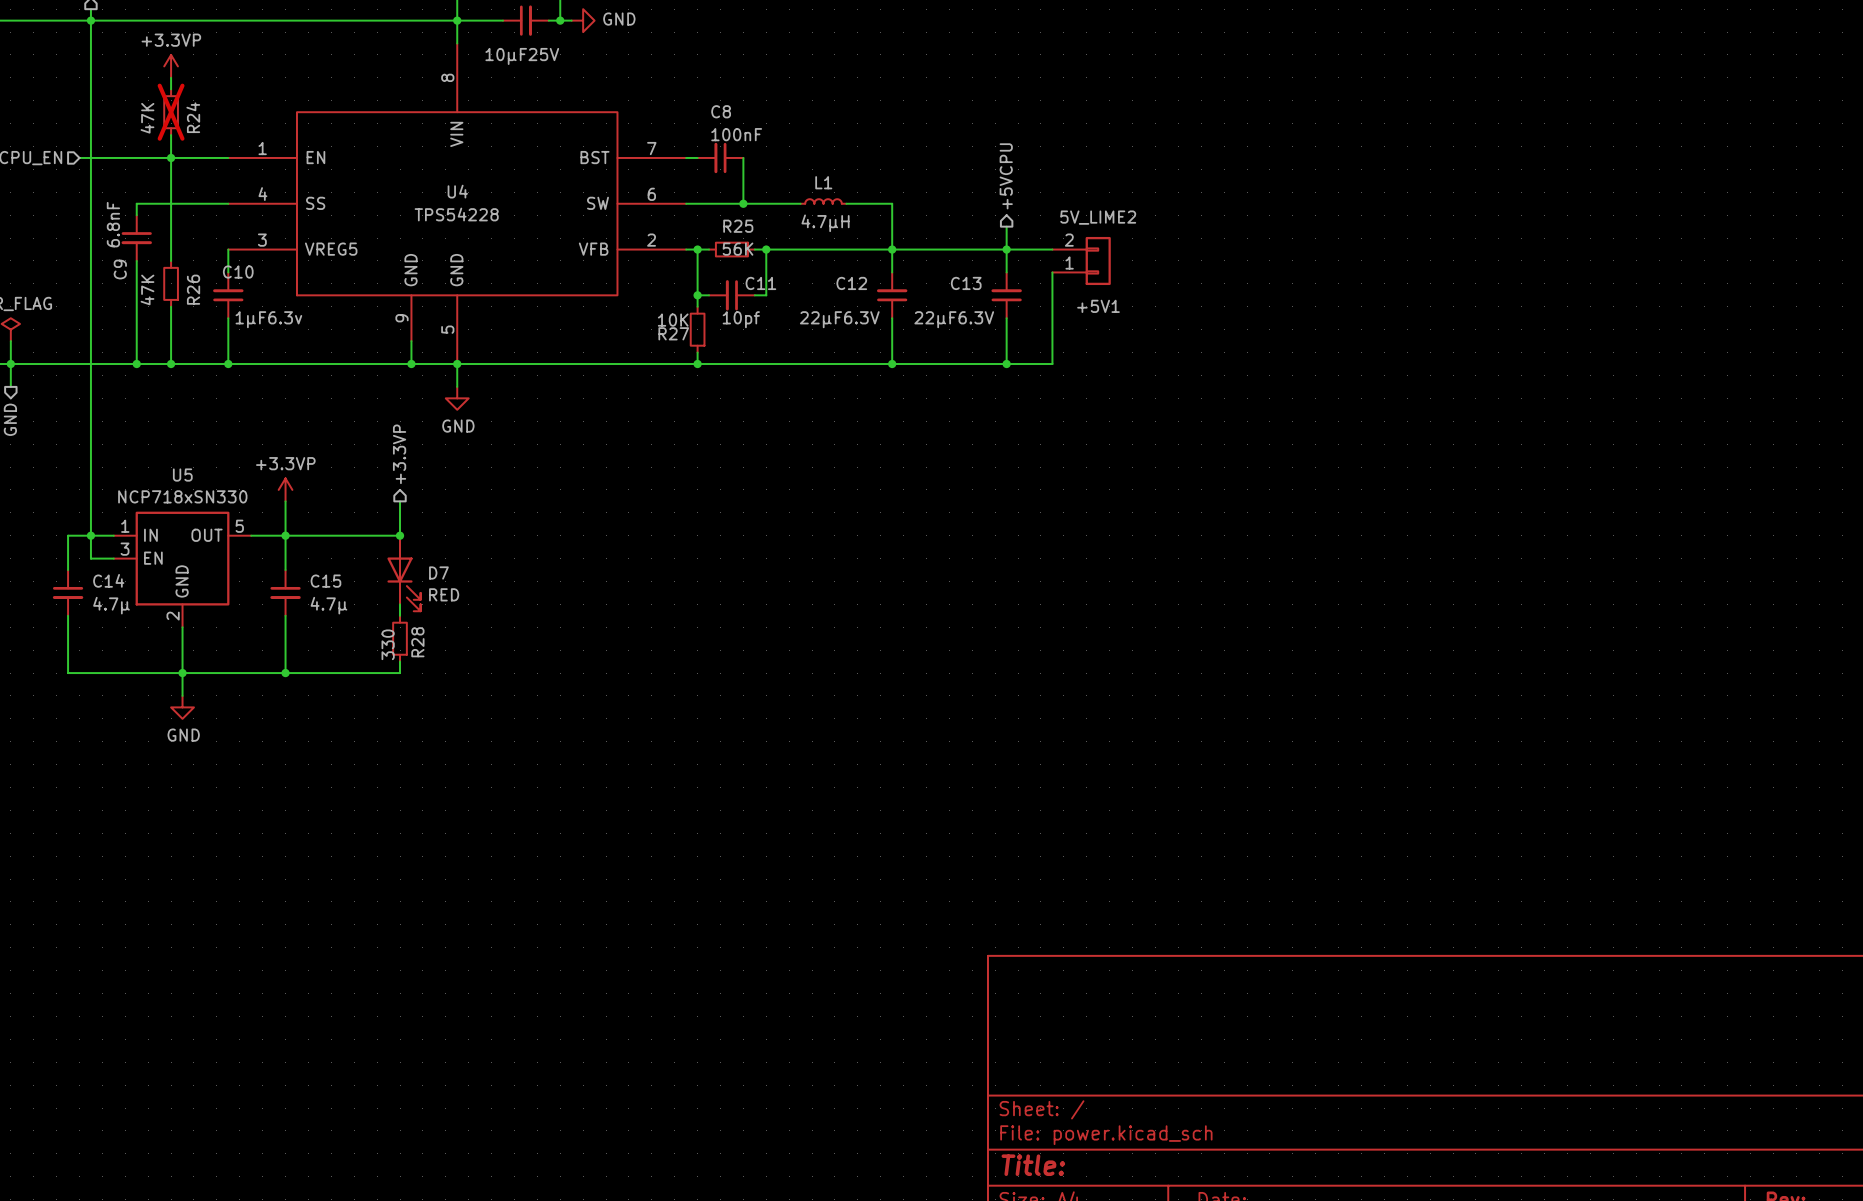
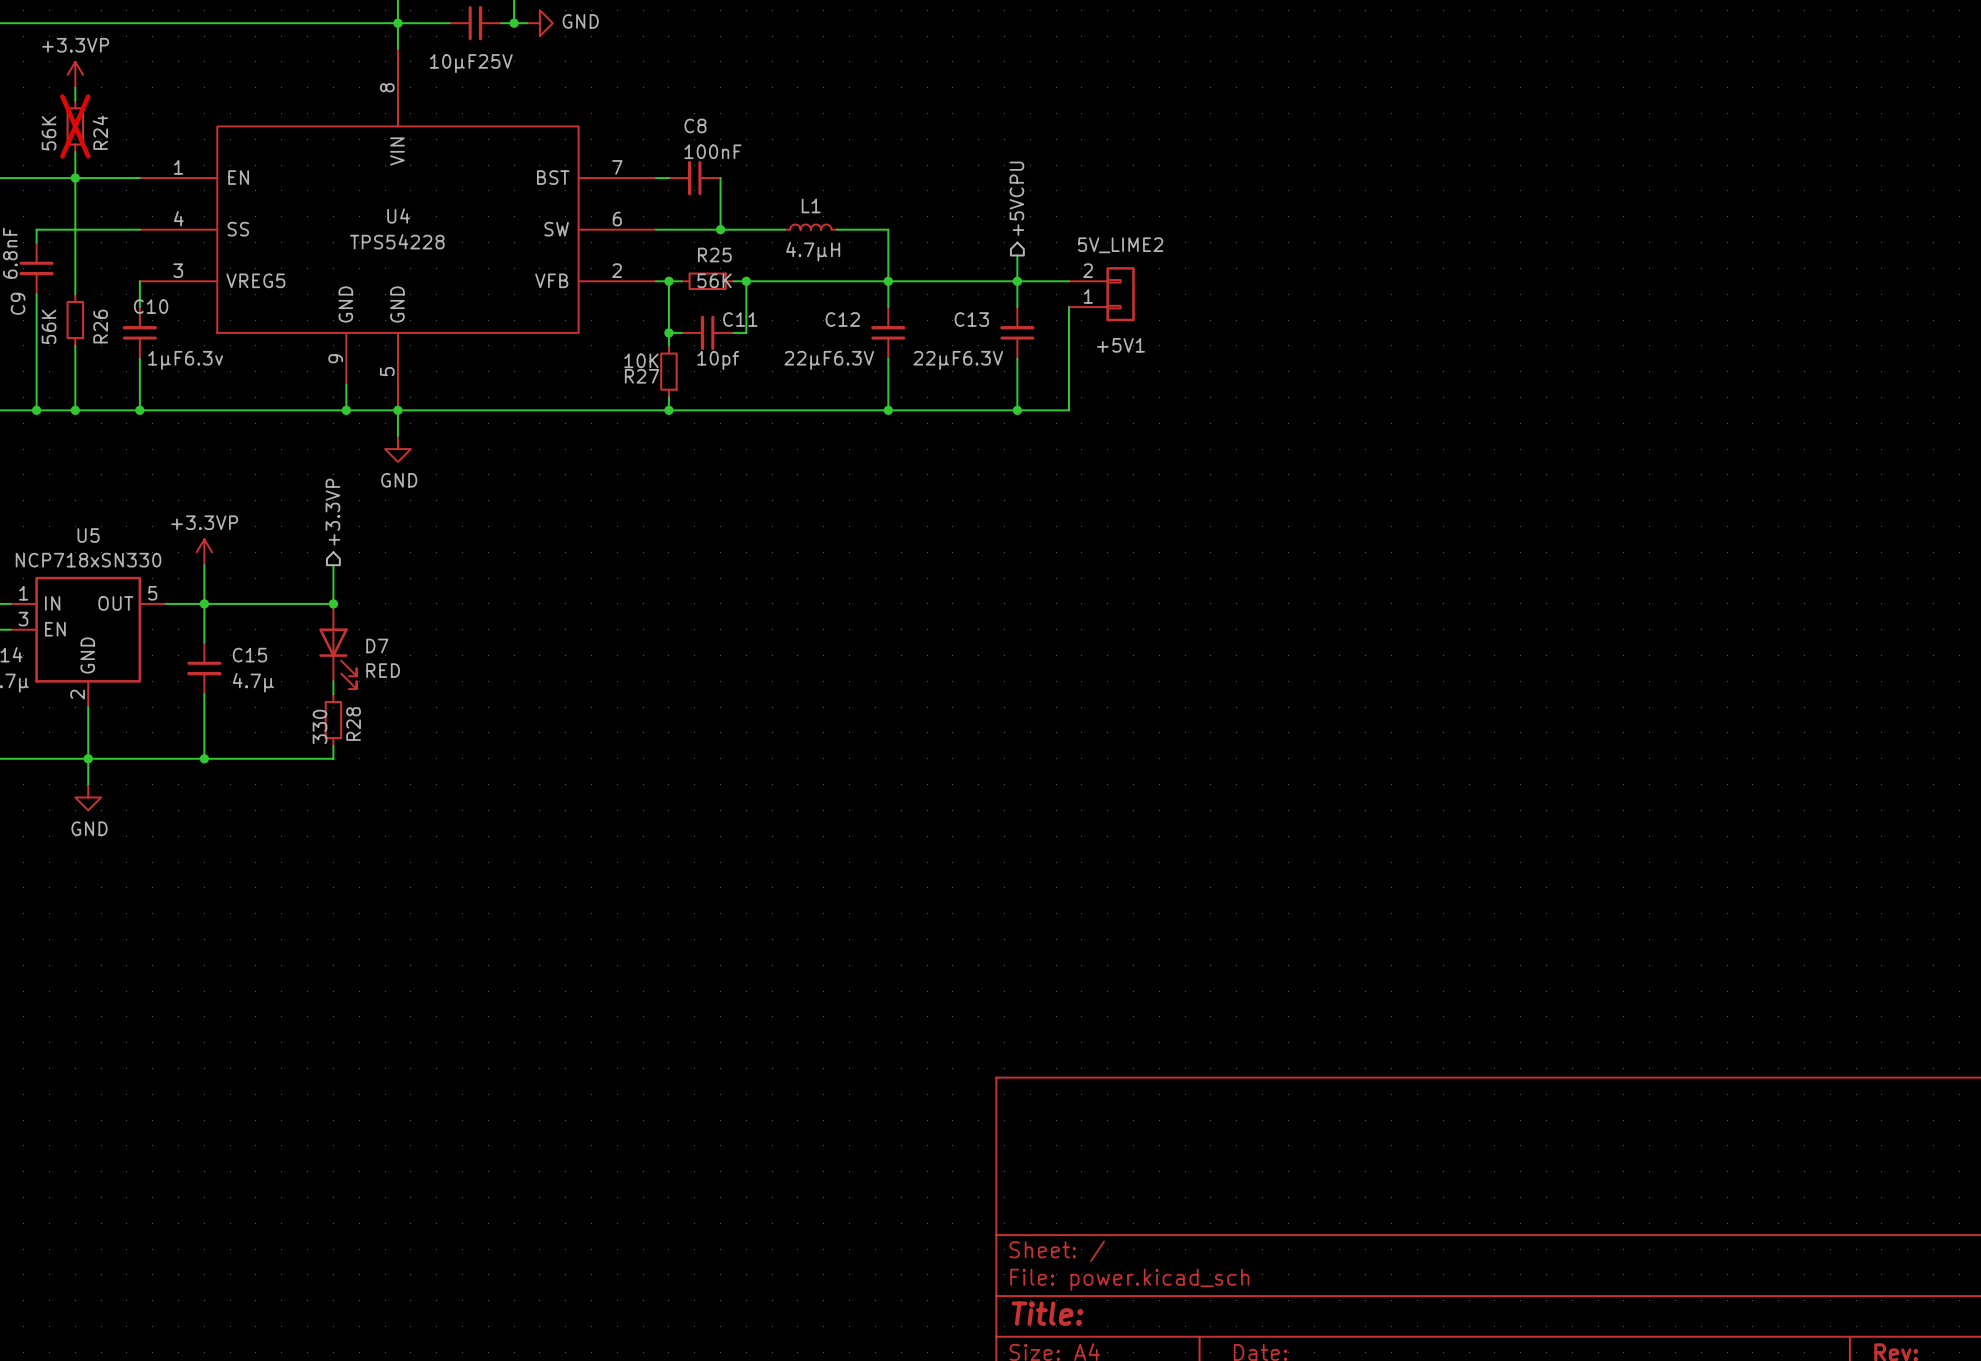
R24 value: 47K (147, 118) -> 56K (49, 133)
R26 value: 47K (147, 289) -> 56K (49, 326)

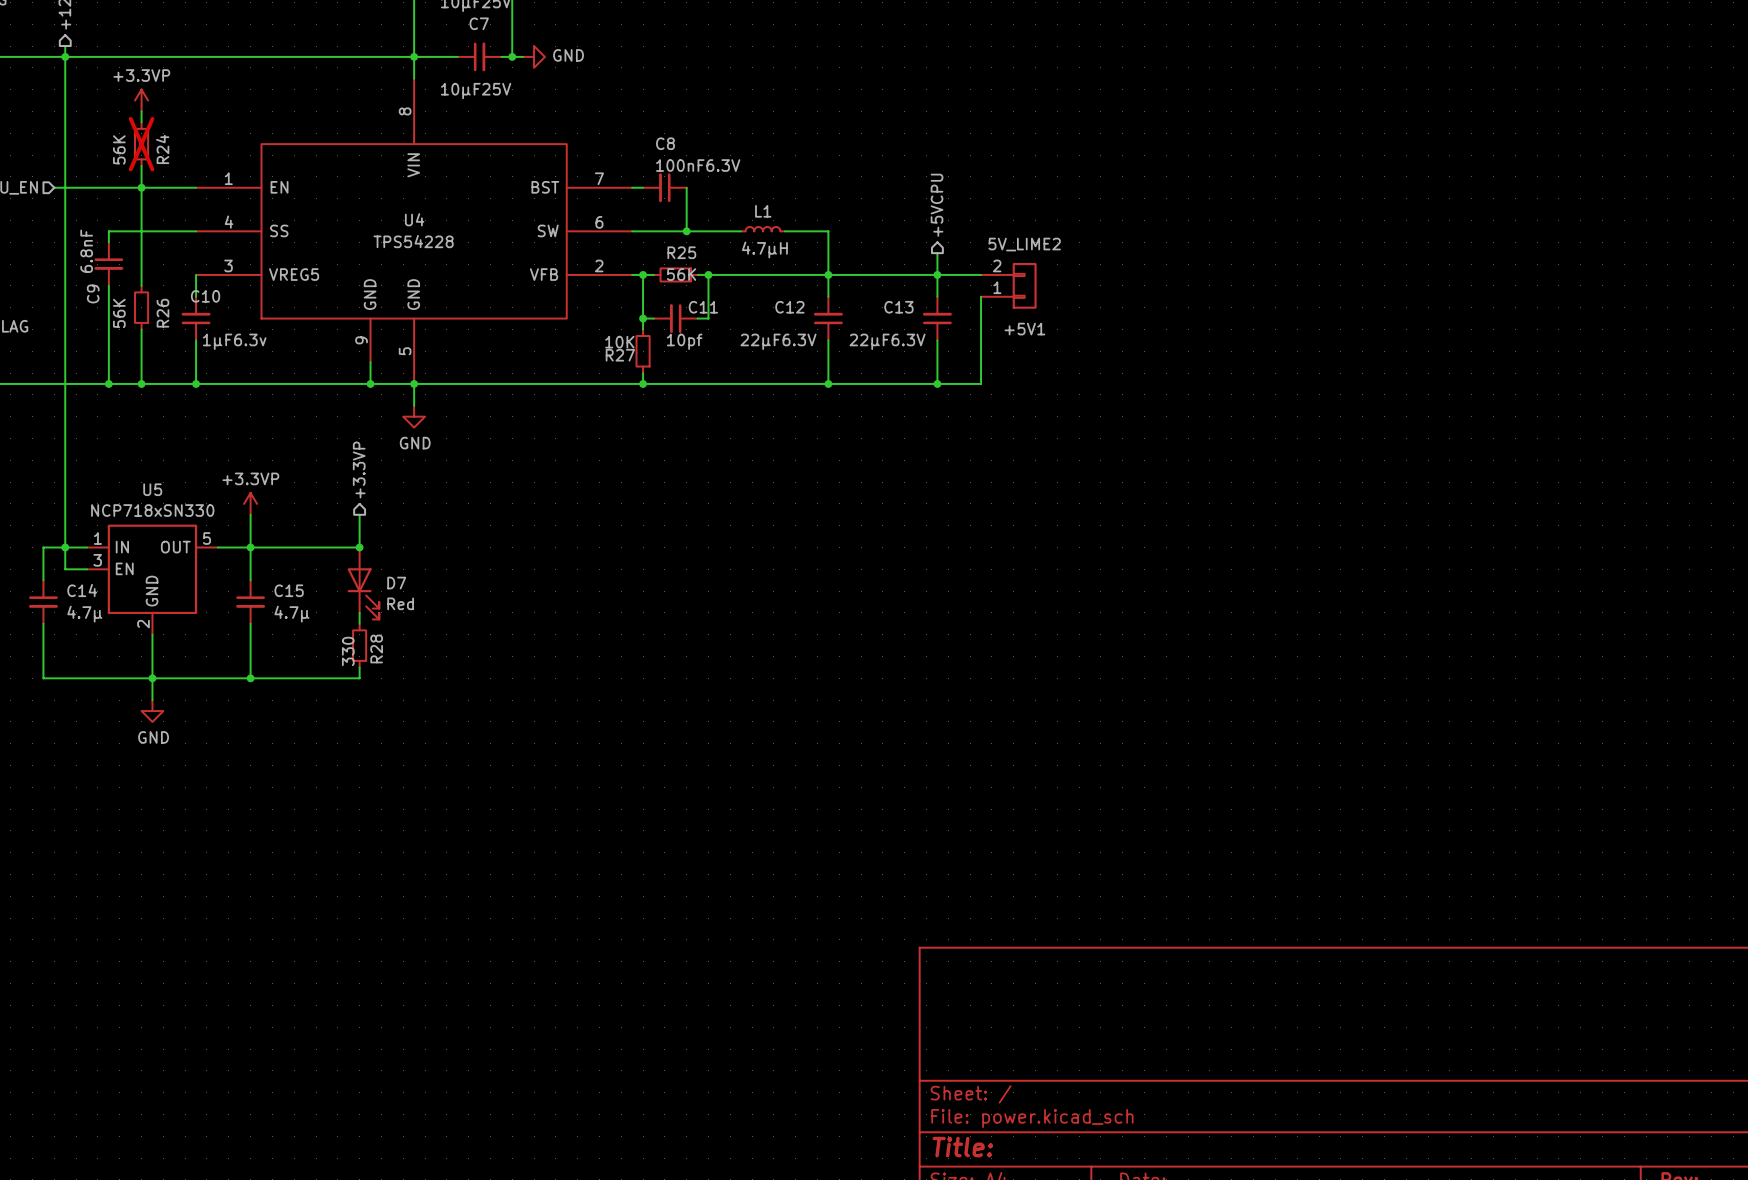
C8 value: 100nF (712, 151) -> 100nF6.3V (698, 165)
D7 value: RED (383, 670) -> Red (400, 603)

